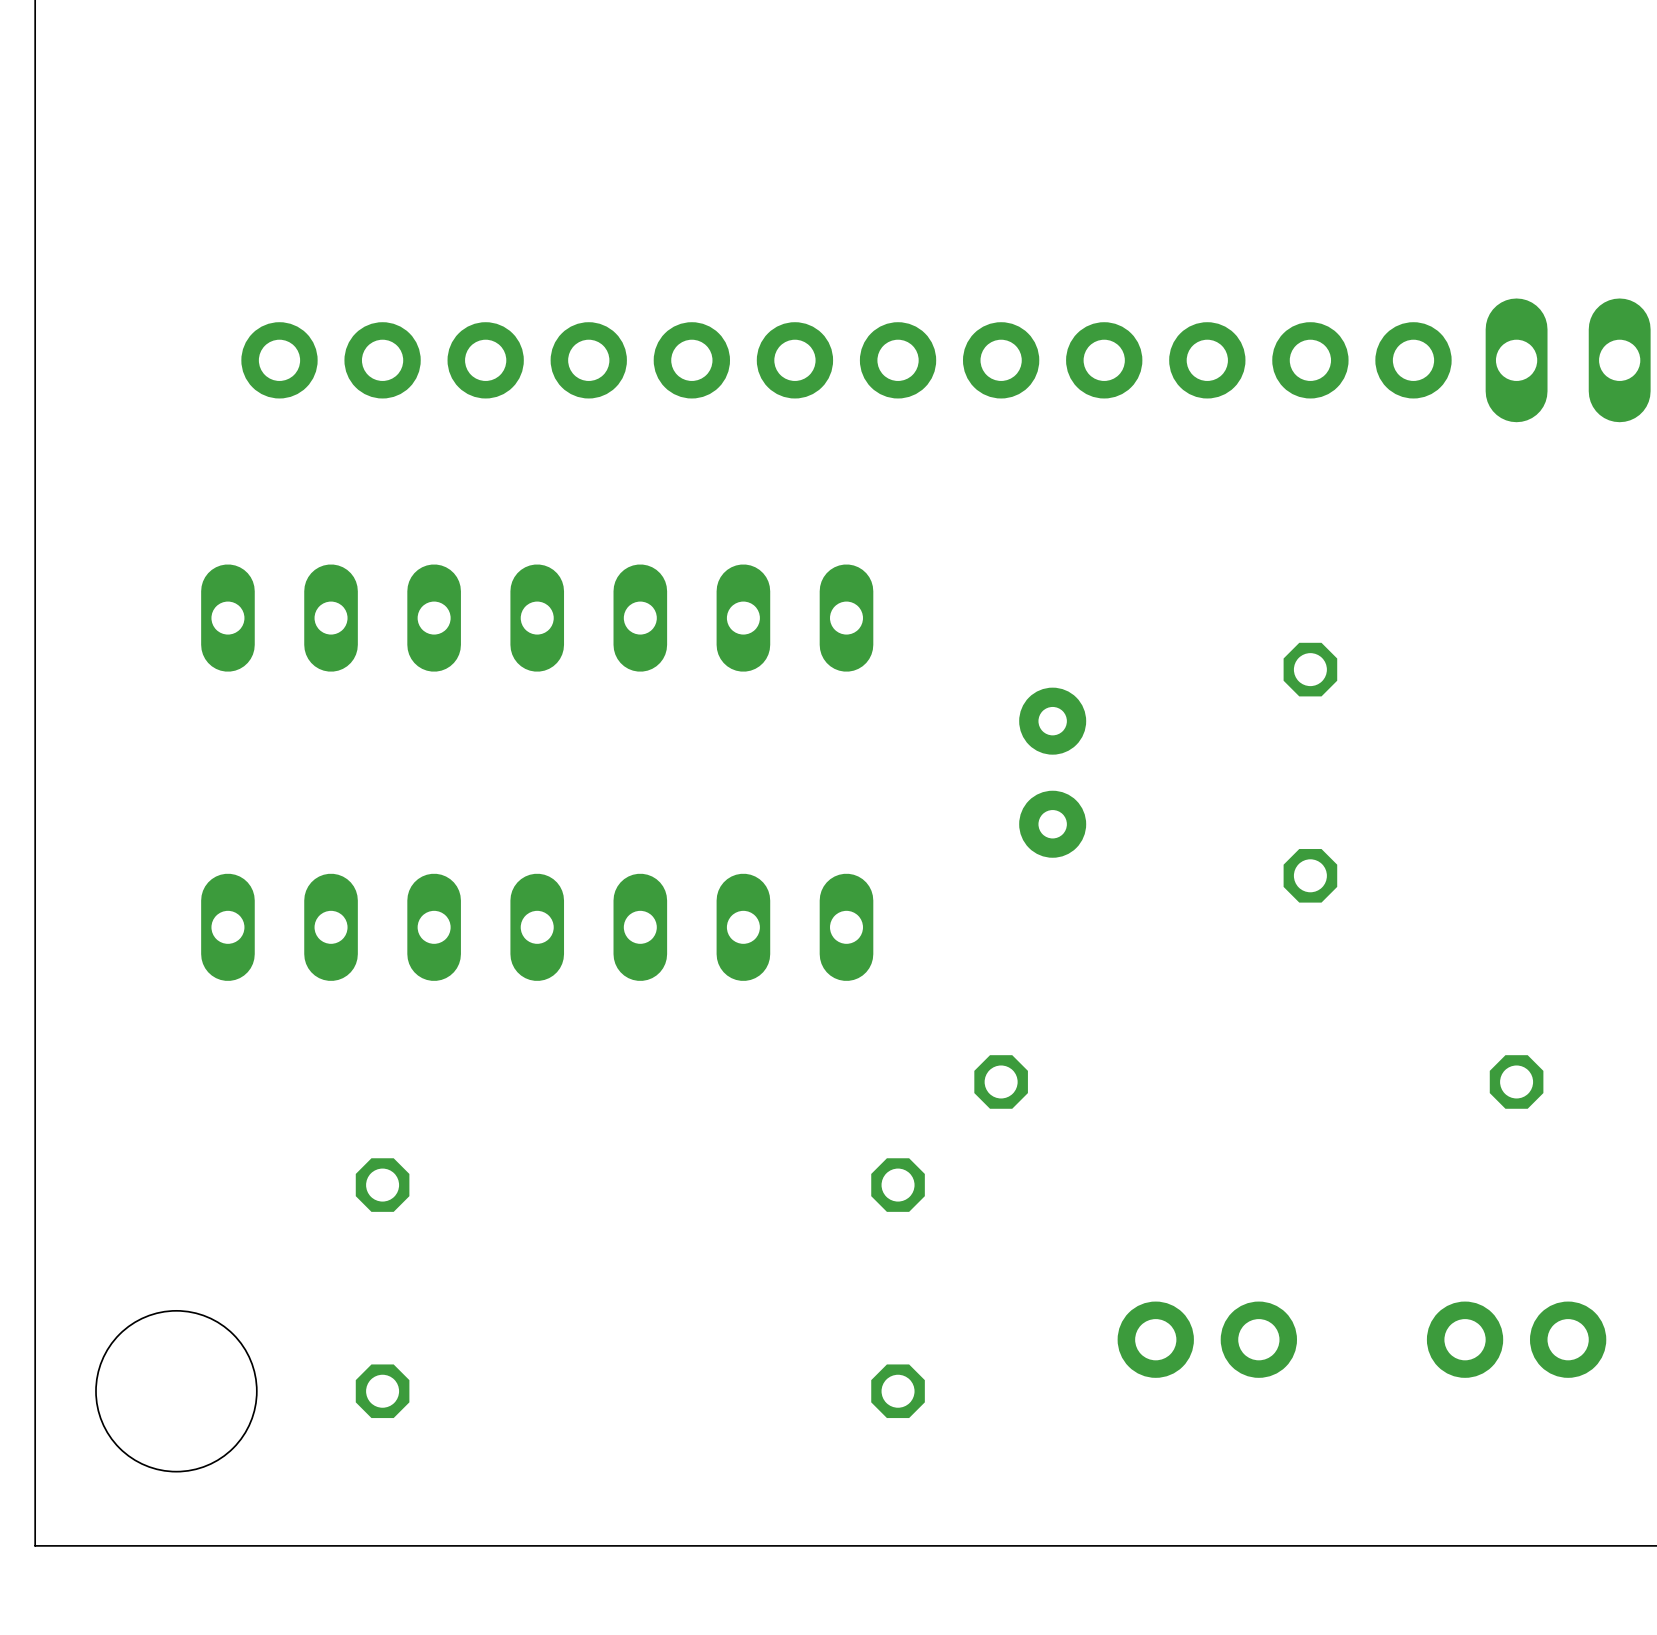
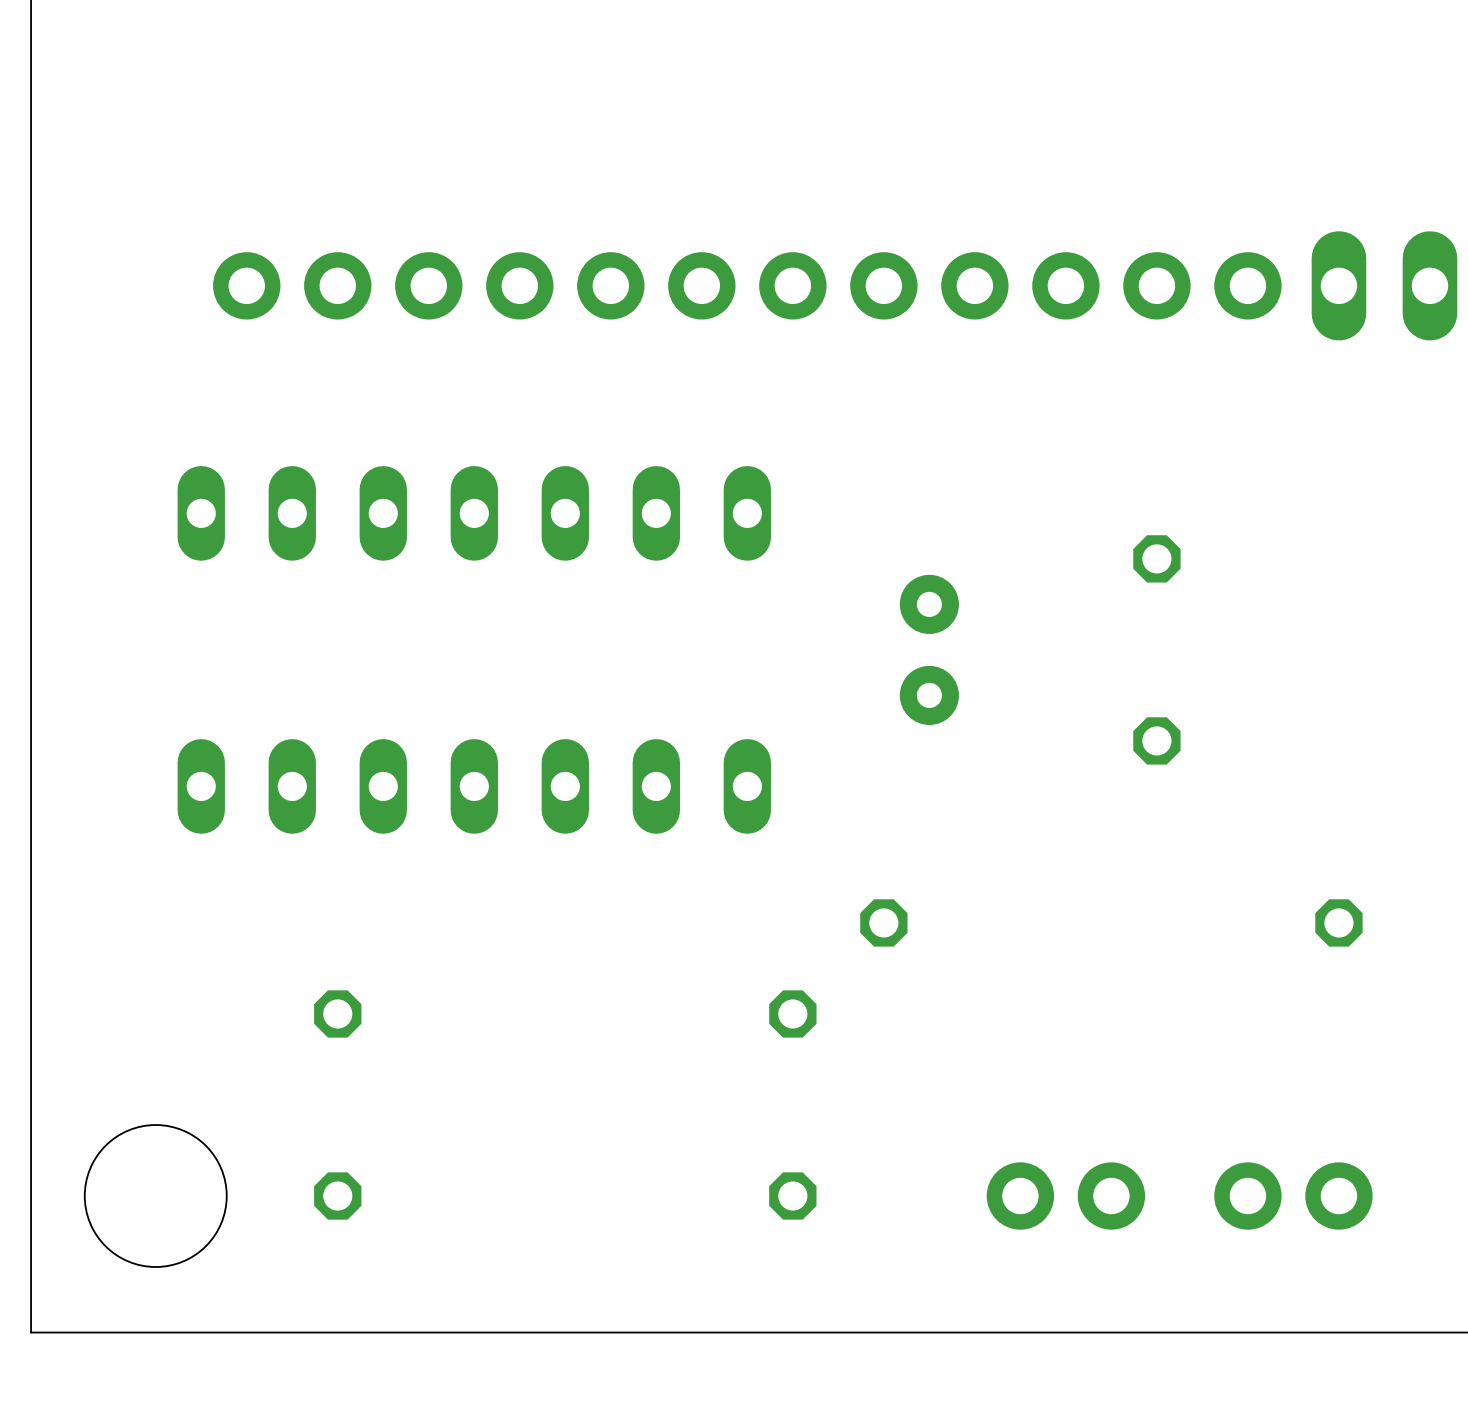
part position: (1207, 1339) -> (1065, 1196)
part position: (1516, 1339) -> (1293, 1196)

